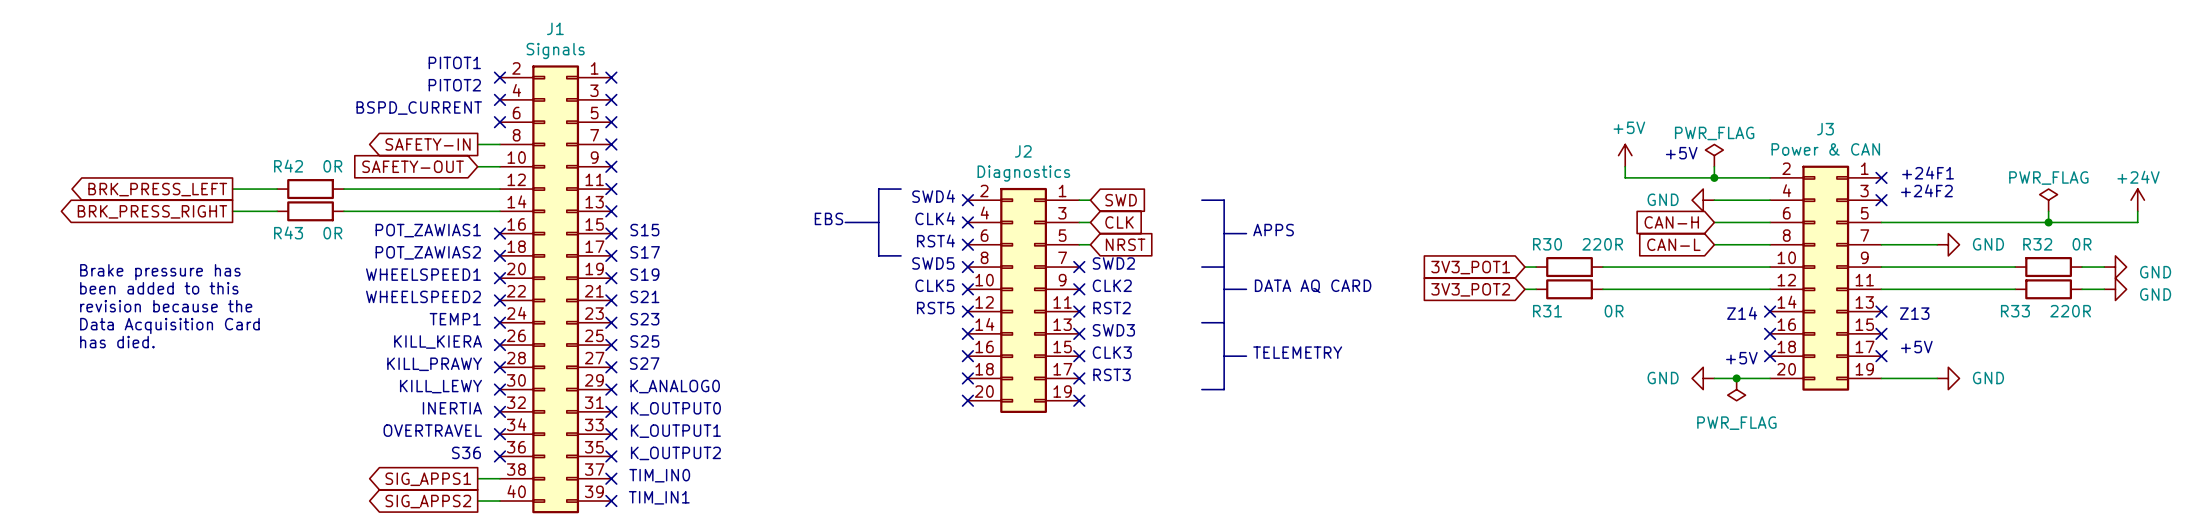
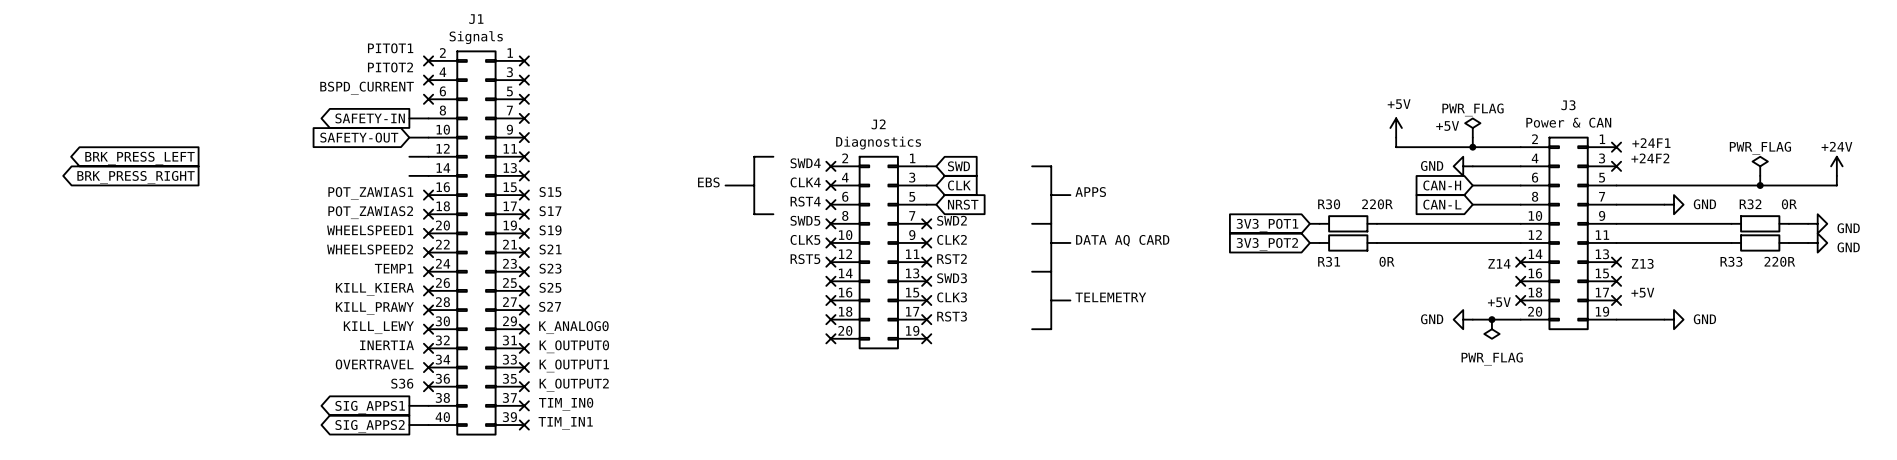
wire: (232, 189) (277, 189) -> none
R42: 0R (310, 189) -> none
wire: (343, 189) (477, 189) -> none
wire: (232, 211) (277, 211) -> none
R43: 0R (310, 211) -> none
wire: (343, 211) (477, 211) -> none
text: Brake pressure has (160, 272) -> none
text: been added to this (159, 288) -> none
text: revision because the (166, 306) -> none
text: Data Acquisition Card (169, 325) -> none
text: has died. (117, 342) -> none

